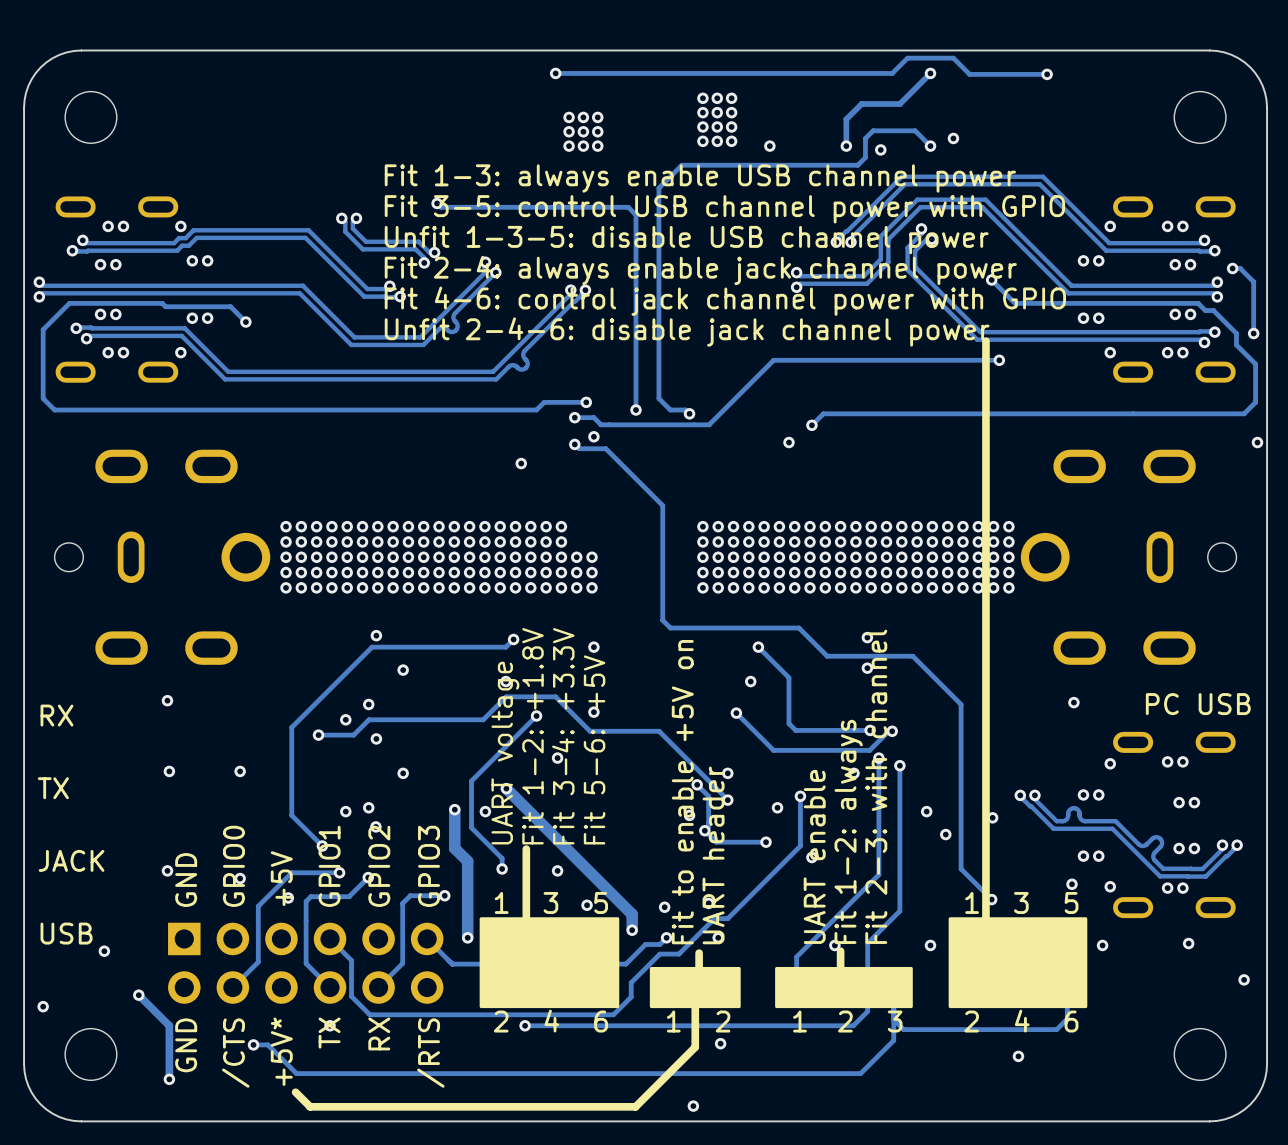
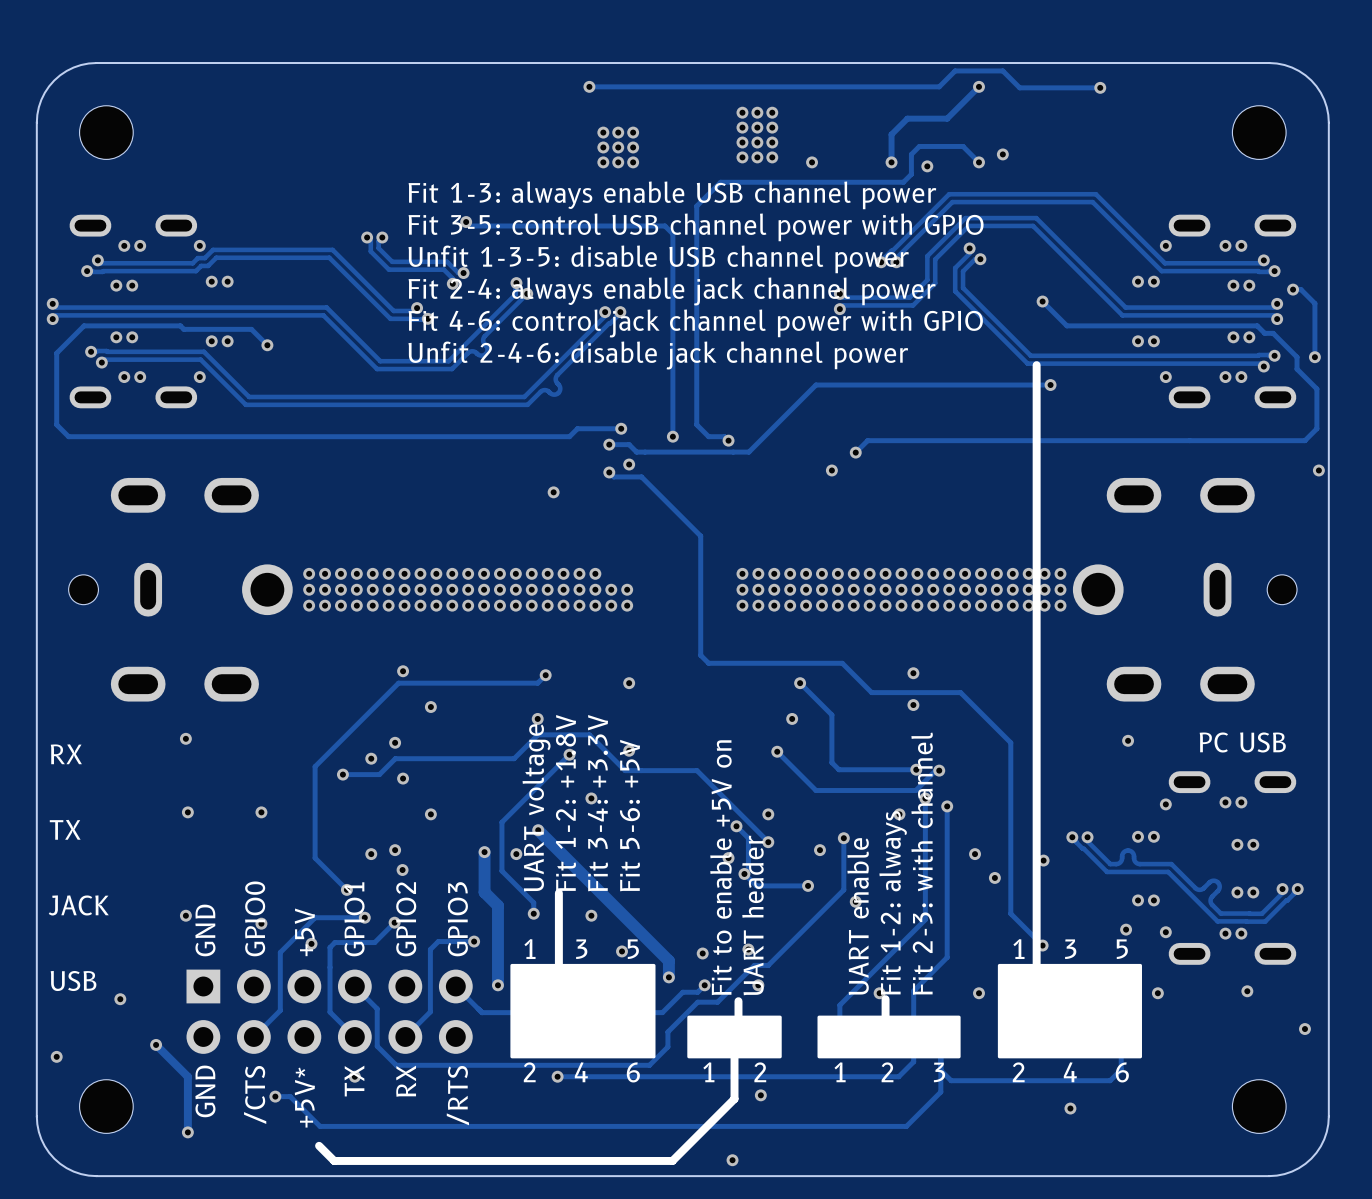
via: (286, 526) -> none
via: (301, 526) -> none
via: (316, 526) -> none
via: (331, 526) -> none
via: (347, 526) -> none
via: (362, 526) -> none
via: (377, 526) -> none
via: (393, 526) -> none
via: (408, 526) -> none
via: (423, 526) -> none
via: (439, 526) -> none
via: (454, 526) -> none
via: (469, 526) -> none
via: (484, 526) -> none
via: (500, 526) -> none
via: (515, 526) -> none
via: (530, 526) -> none
via: (546, 526) -> none
via: (561, 526) -> none
via: (702, 526) -> none
via: (718, 526) -> none
via: (733, 526) -> none
via: (748, 526) -> none
via: (764, 526) -> none
via: (779, 526) -> none
via: (794, 526) -> none
via: (810, 526) -> none
via: (825, 526) -> none
via: (840, 526) -> none
via: (855, 526) -> none
via: (871, 526) -> none
via: (886, 526) -> none
via: (901, 526) -> none
via: (917, 526) -> none
via: (932, 526) -> none
via: (947, 526) -> none
via: (963, 526) -> none
via: (978, 526) -> none
via: (993, 526) -> none
via: (1008, 526) -> none
via: (286, 587) -> none
via: (301, 587) -> none
via: (316, 587) -> none
via: (331, 587) -> none
via: (347, 587) -> none
via: (362, 587) -> none
via: (377, 587) -> none
via: (393, 587) -> none
via: (408, 587) -> none
via: (423, 587) -> none
via: (439, 587) -> none
via: (454, 587) -> none
via: (469, 587) -> none
via: (484, 587) -> none
via: (500, 587) -> none
via: (515, 587) -> none
via: (530, 587) -> none
via: (546, 587) -> none
via: (561, 587) -> none
via: (576, 587) -> none
via: (592, 587) -> none
via: (702, 587) -> none
via: (718, 587) -> none
via: (733, 587) -> none
via: (748, 587) -> none
via: (764, 587) -> none
via: (779, 587) -> none
via: (794, 587) -> none
via: (810, 587) -> none
via: (825, 587) -> none
via: (840, 587) -> none
via: (855, 587) -> none
via: (871, 587) -> none
via: (886, 587) -> none
via: (901, 587) -> none
via: (917, 587) -> none
via: (932, 587) -> none
via: (947, 587) -> none
via: (963, 587) -> none
via: (978, 587) -> none
via: (993, 587) -> none
via: (1008, 587) -> none

